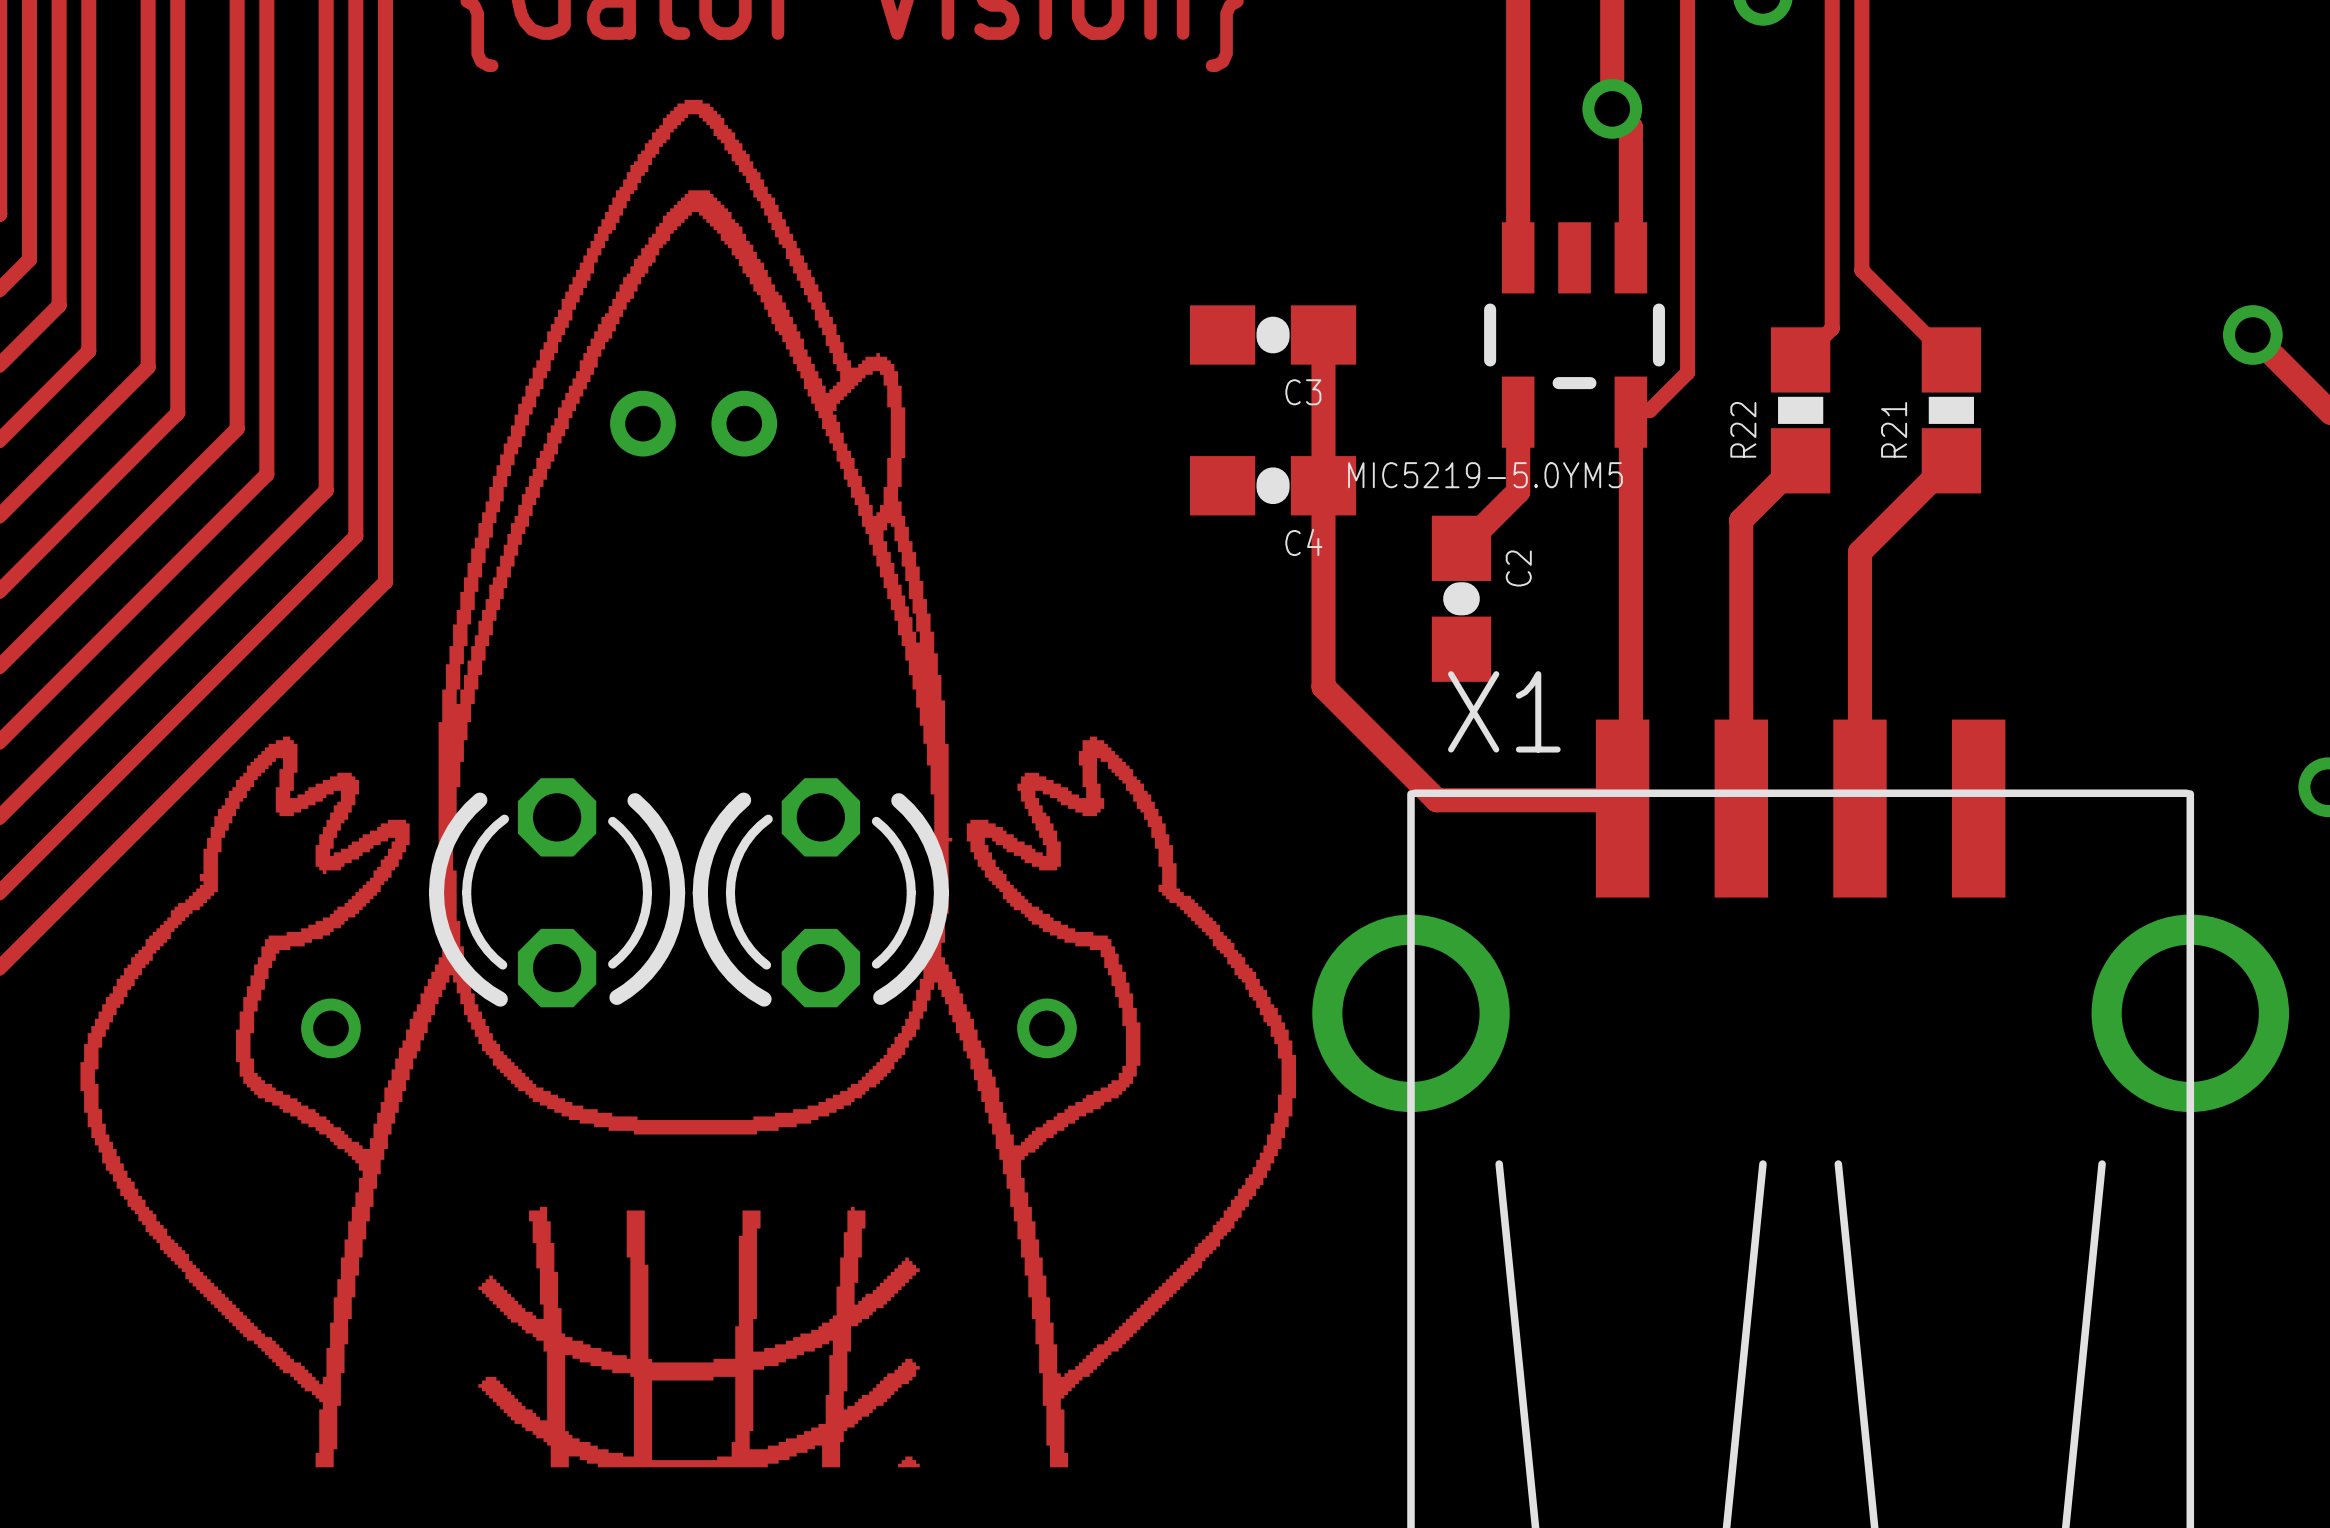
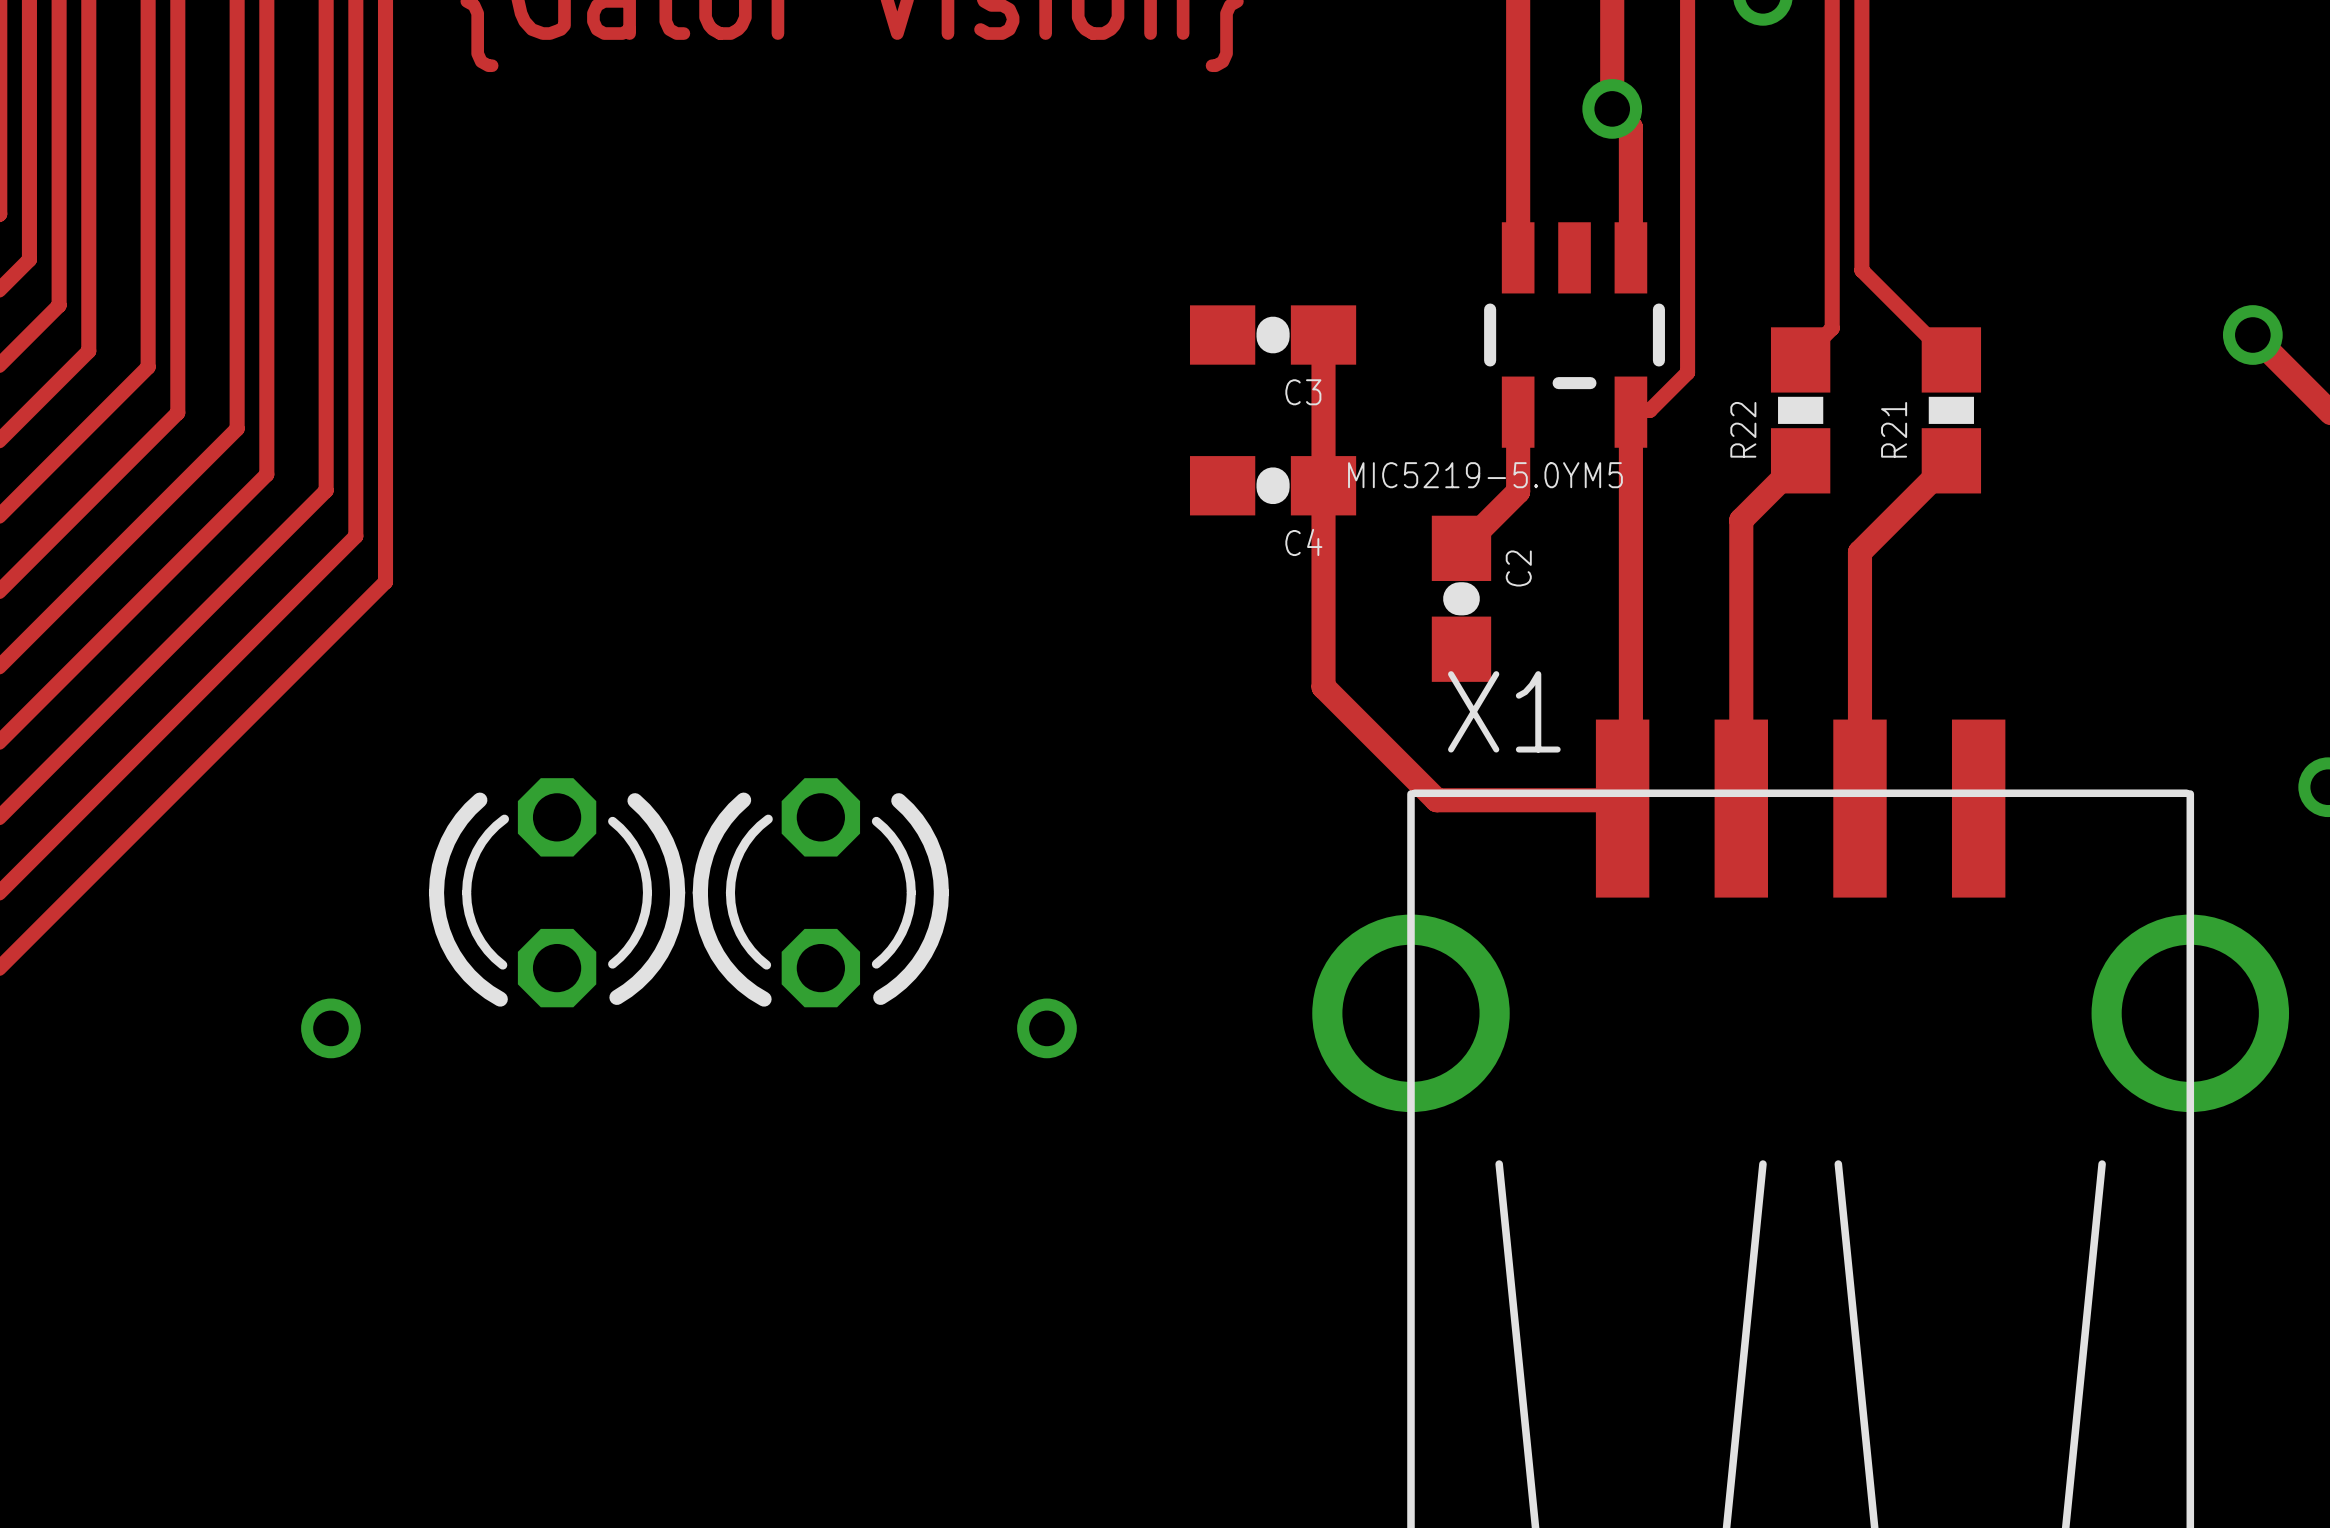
part: (688, 783) -> none

